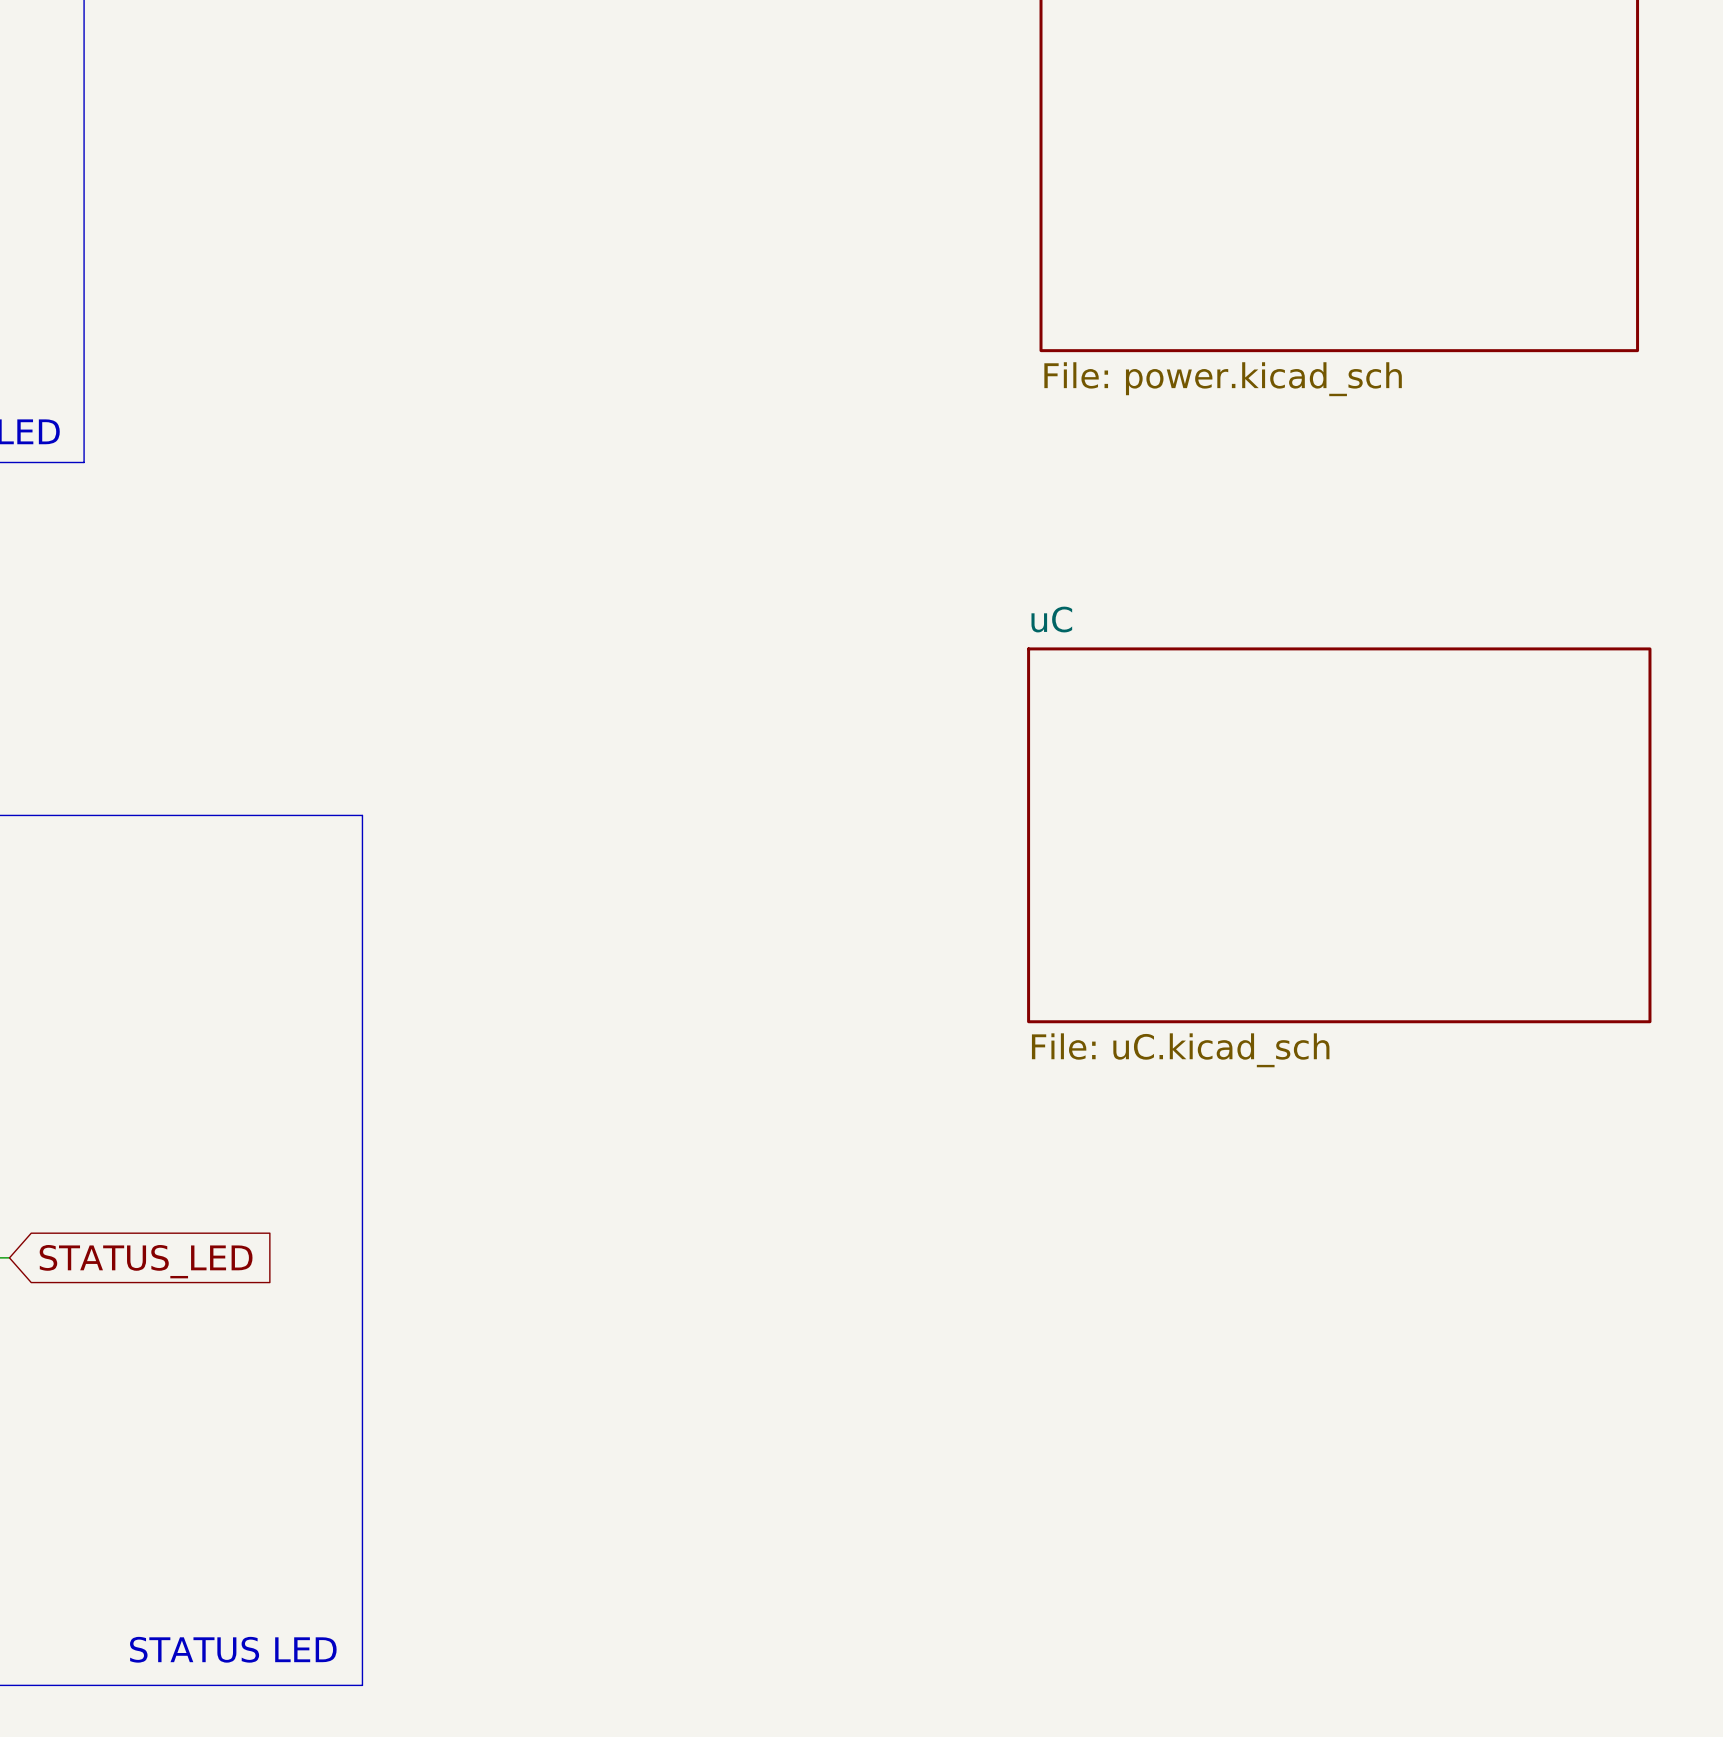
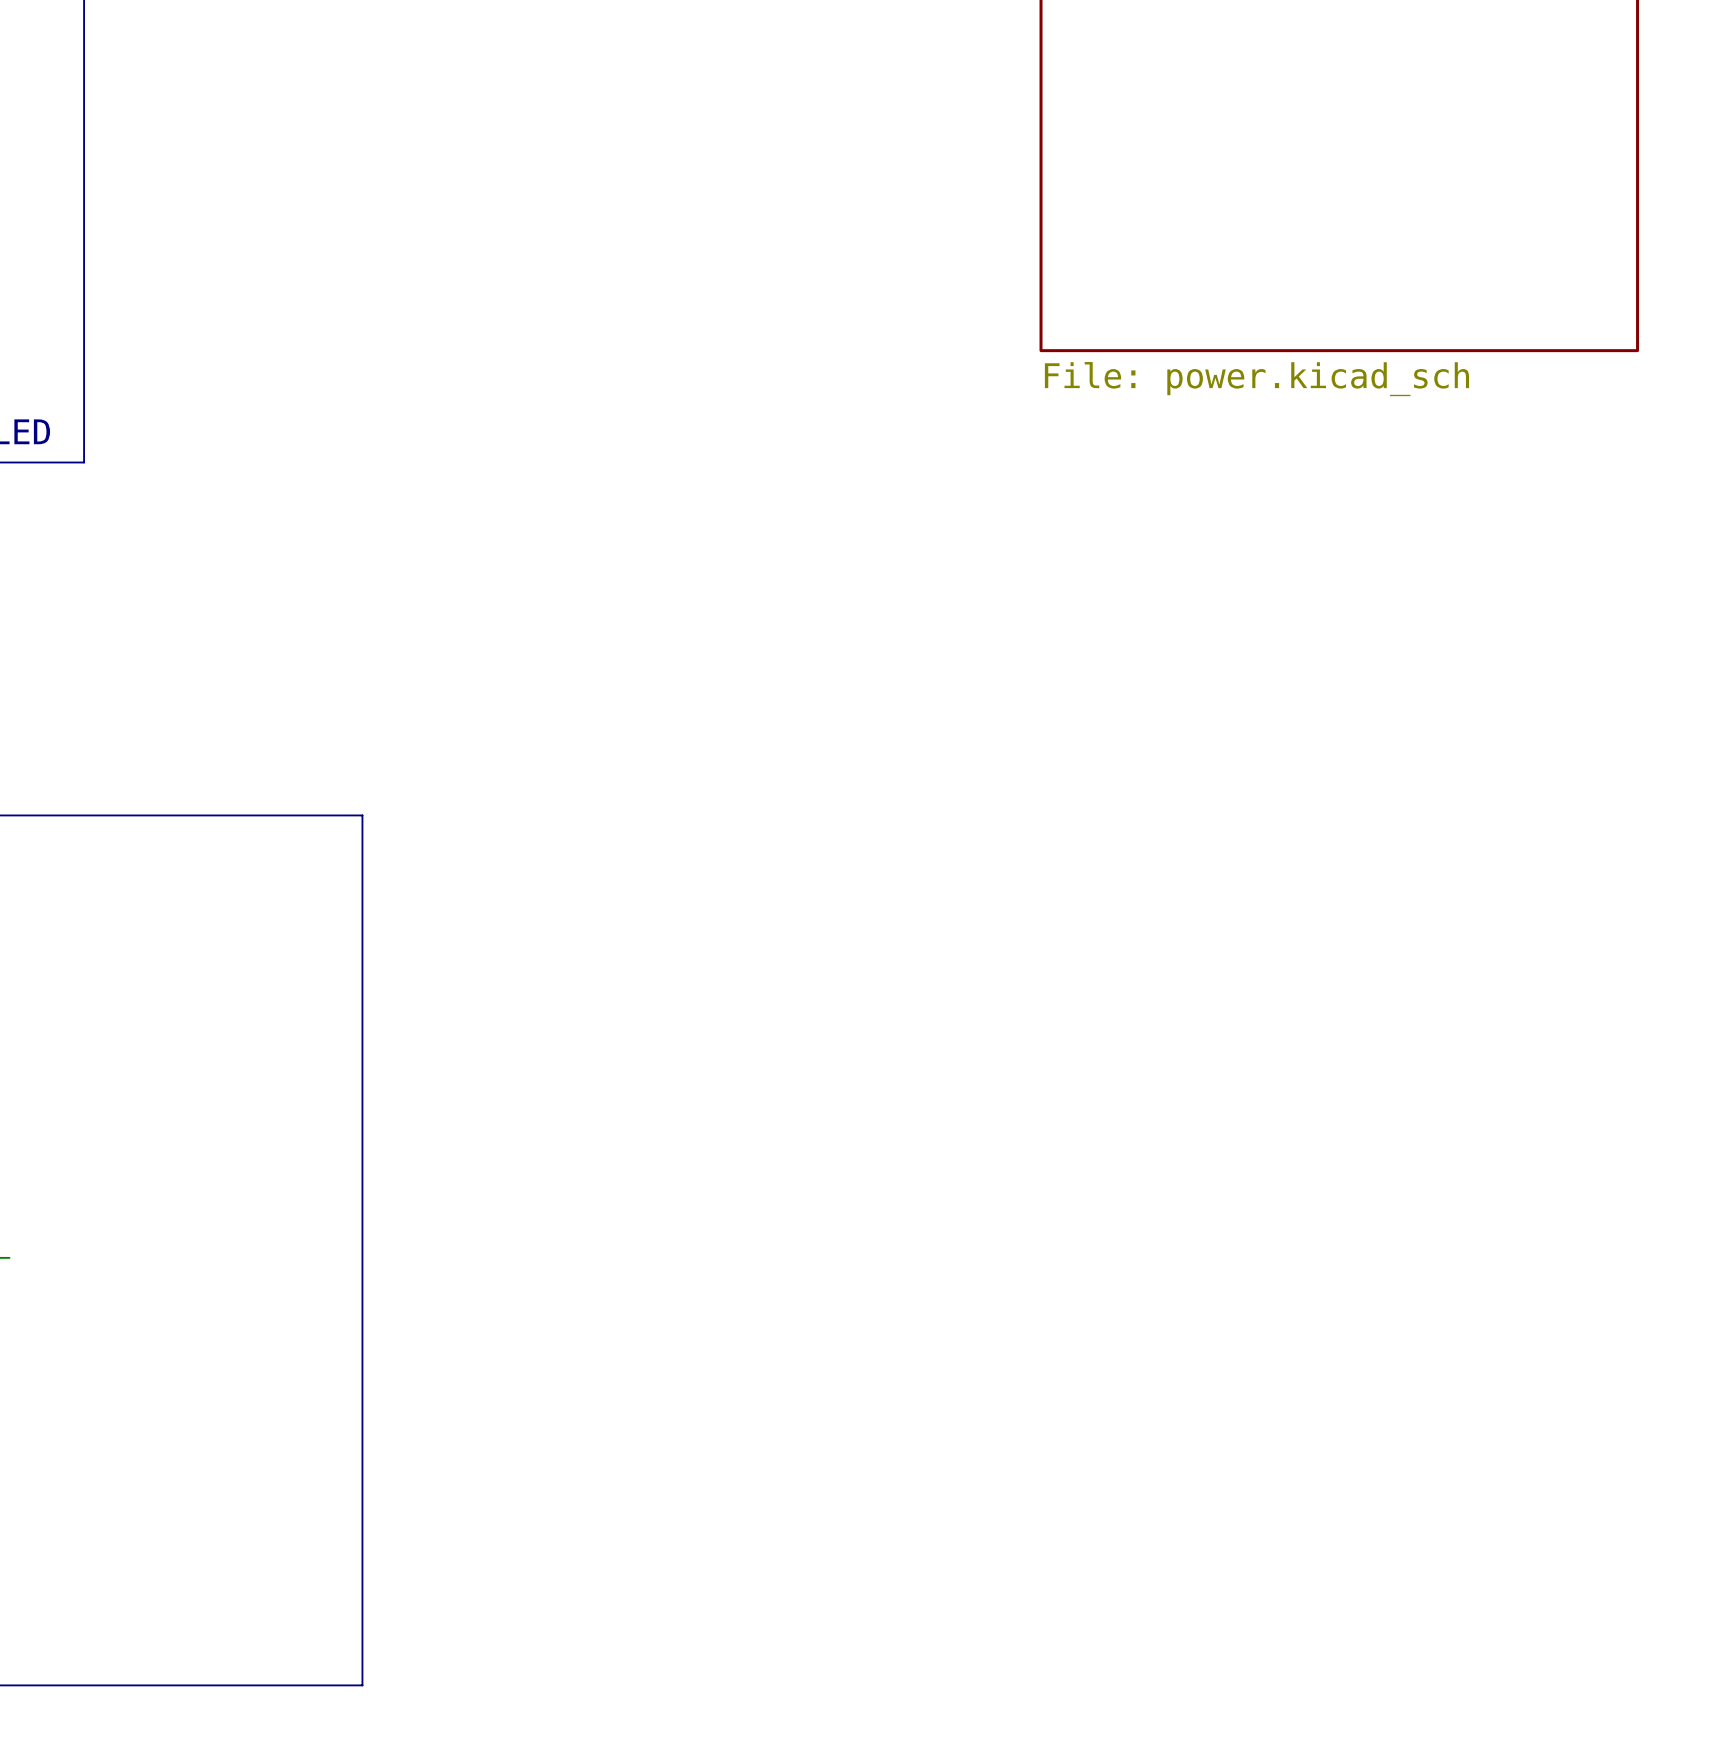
sheet uC: File: uC.kicad_sch (1339, 835) -> none
global label: STATUS_LED (146, 1261) -> none
text: STATUS LED (233, 1649) -> none

